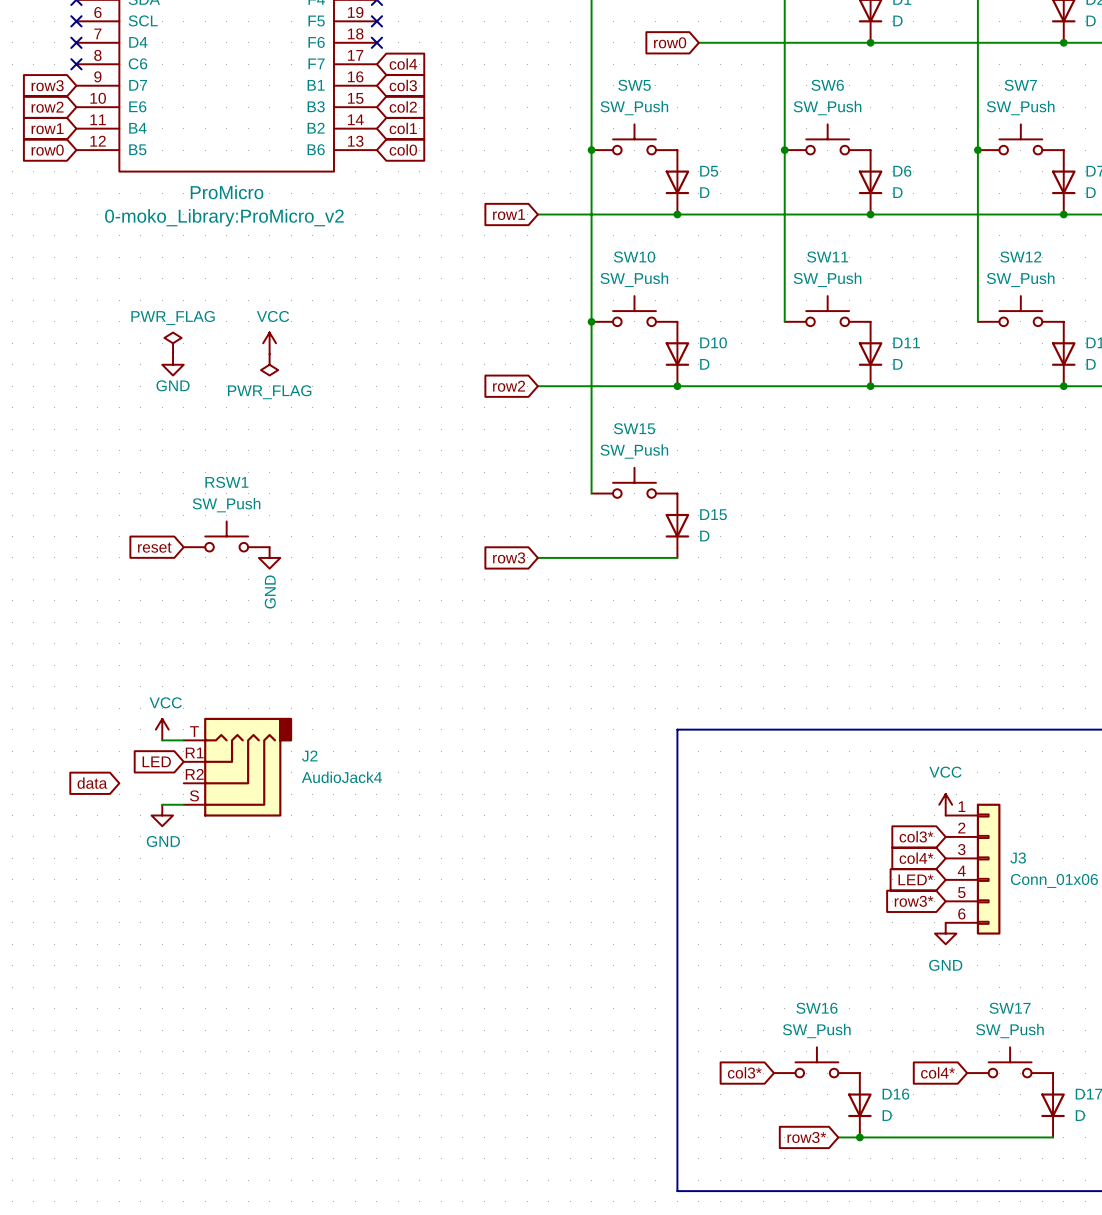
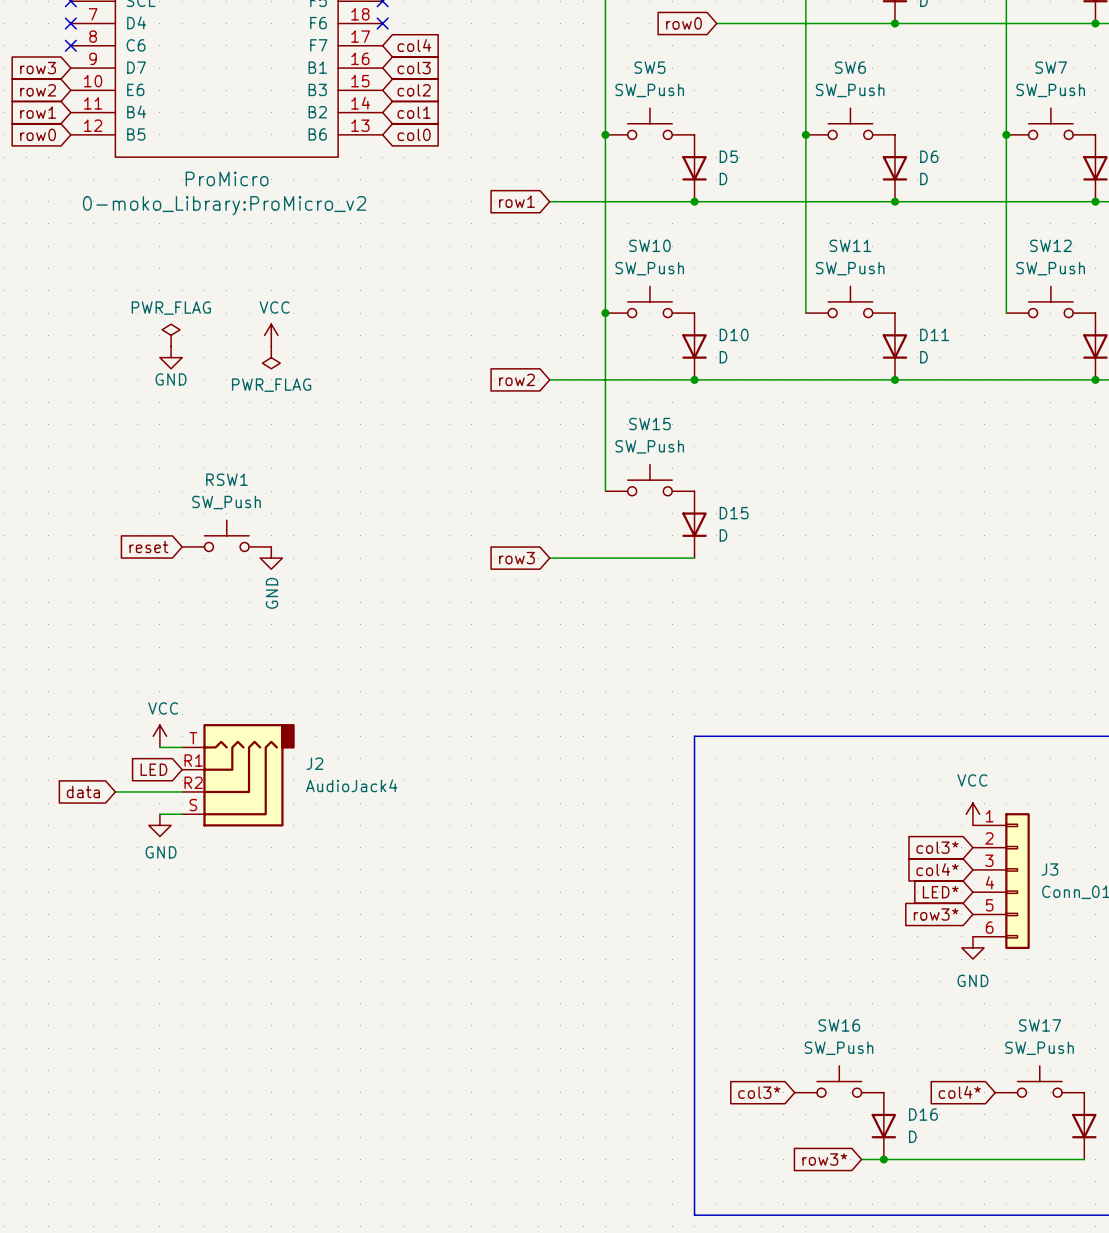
wire: none -> (115, 791) (182, 791)

